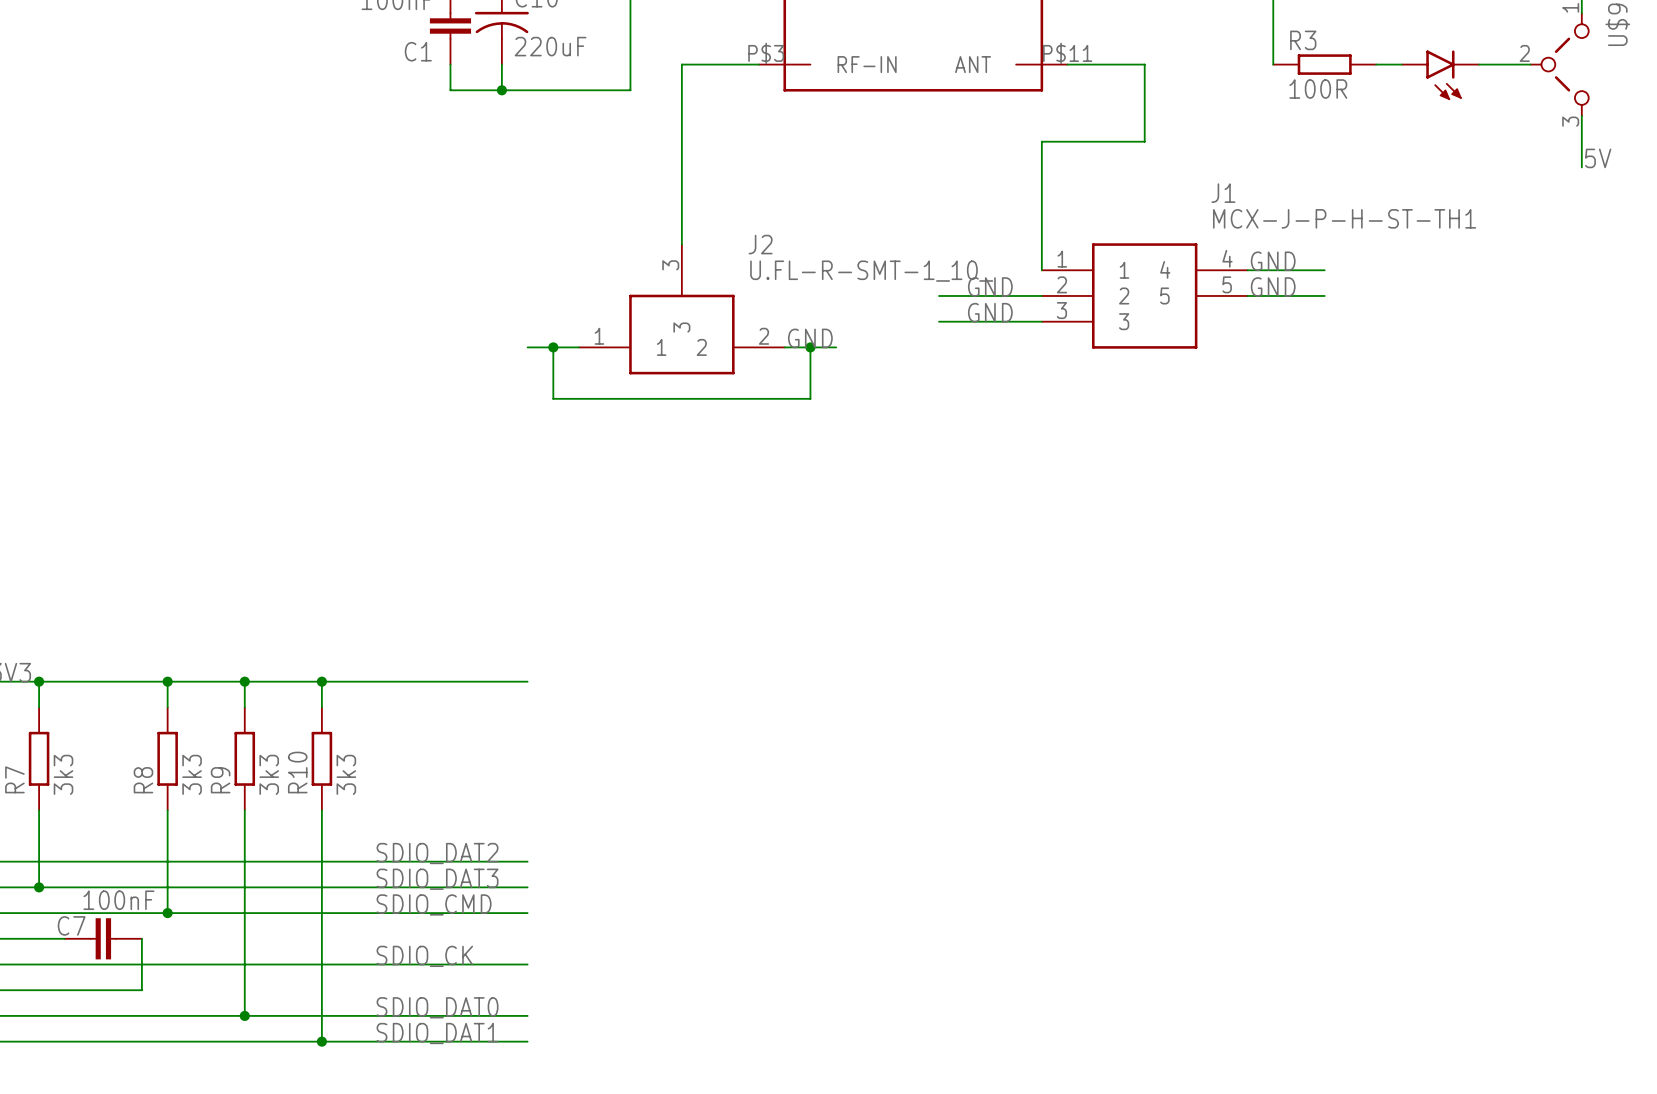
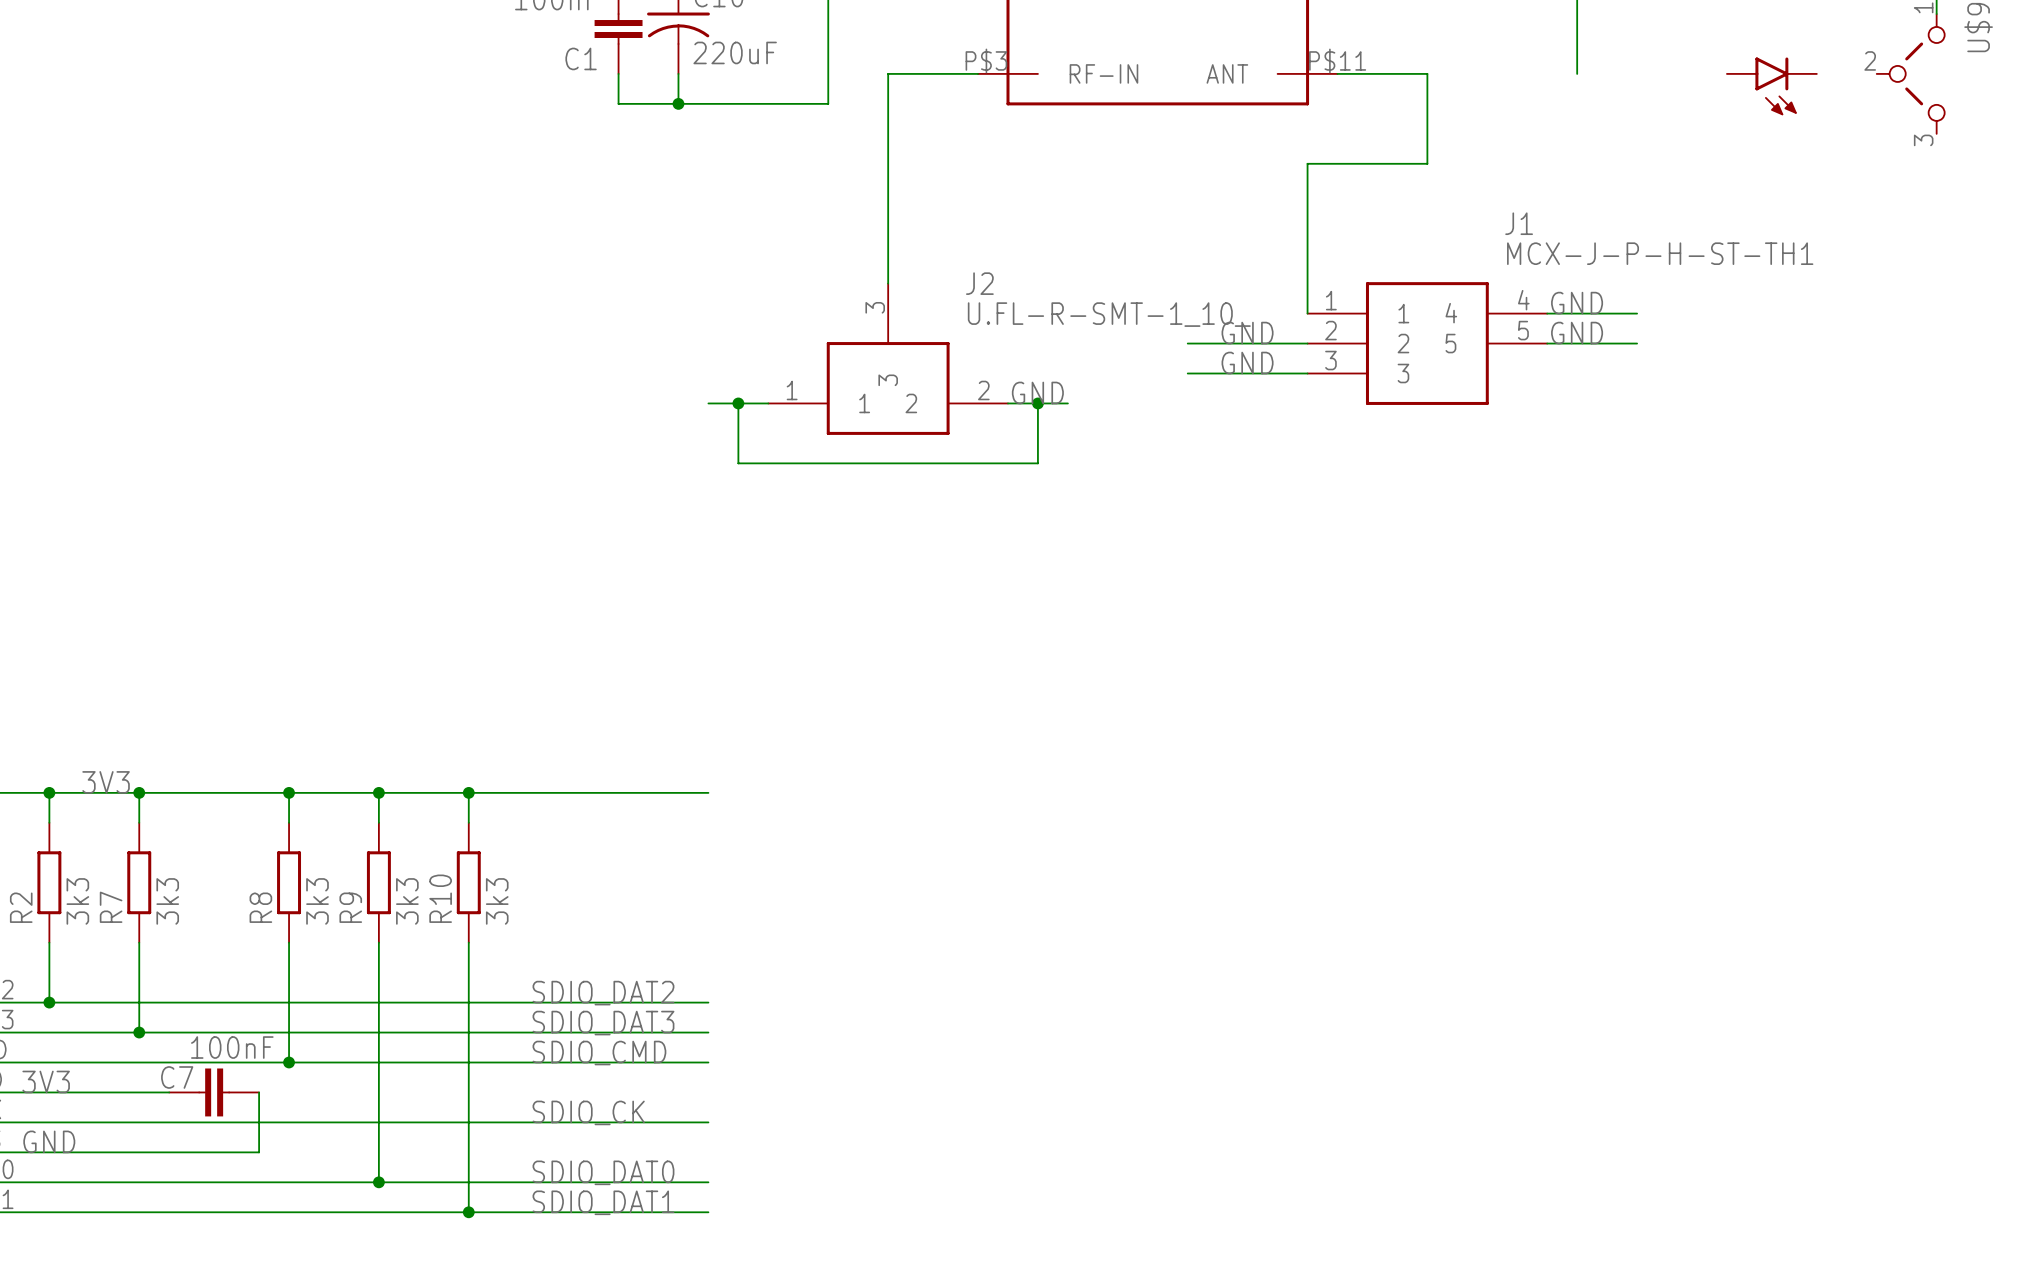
R3: 100R (1324, 64) -> none
wire: (1376, 64) (1401, 64) -> none
wire: (1478, 64) (1530, 64) -> none
wire: (1581, 116) (1581, 167) -> none
label: 5V (1598, 158) -> none

